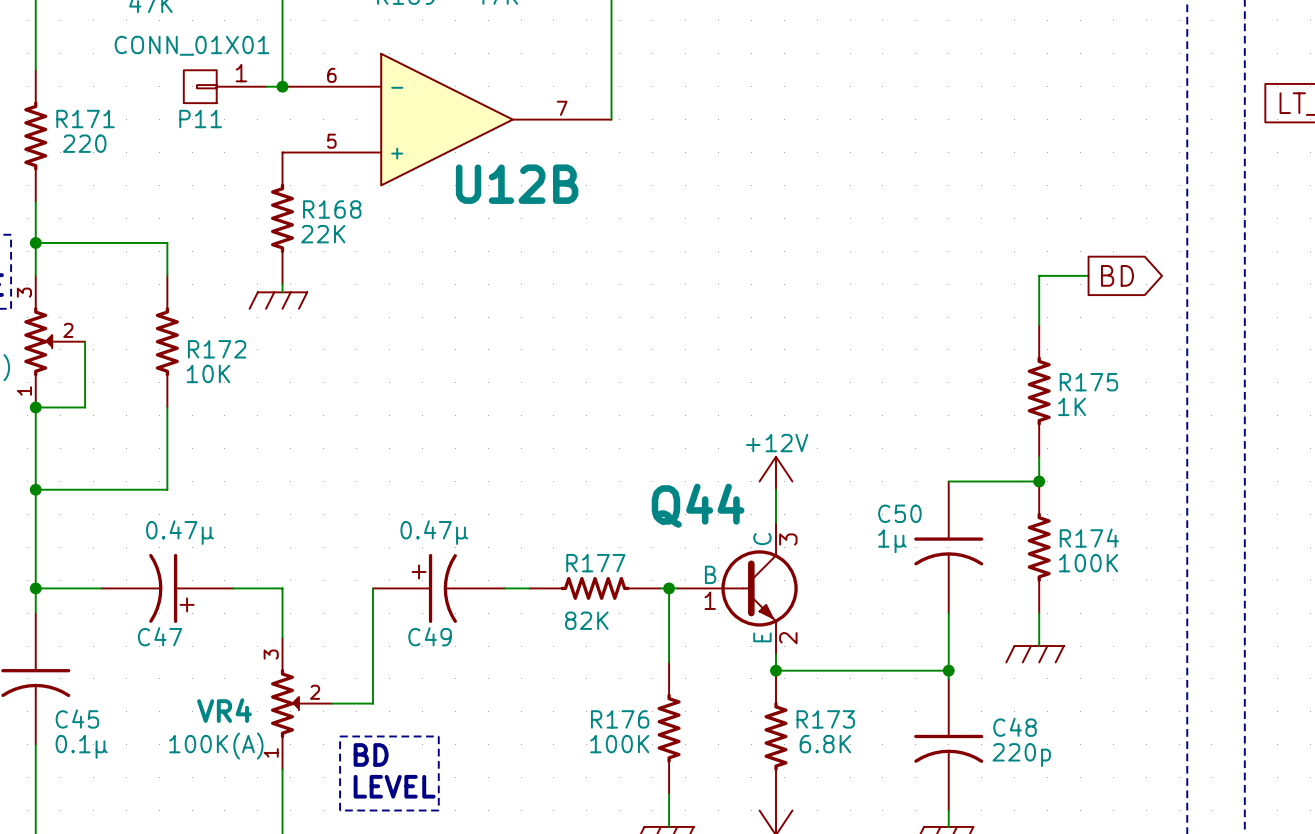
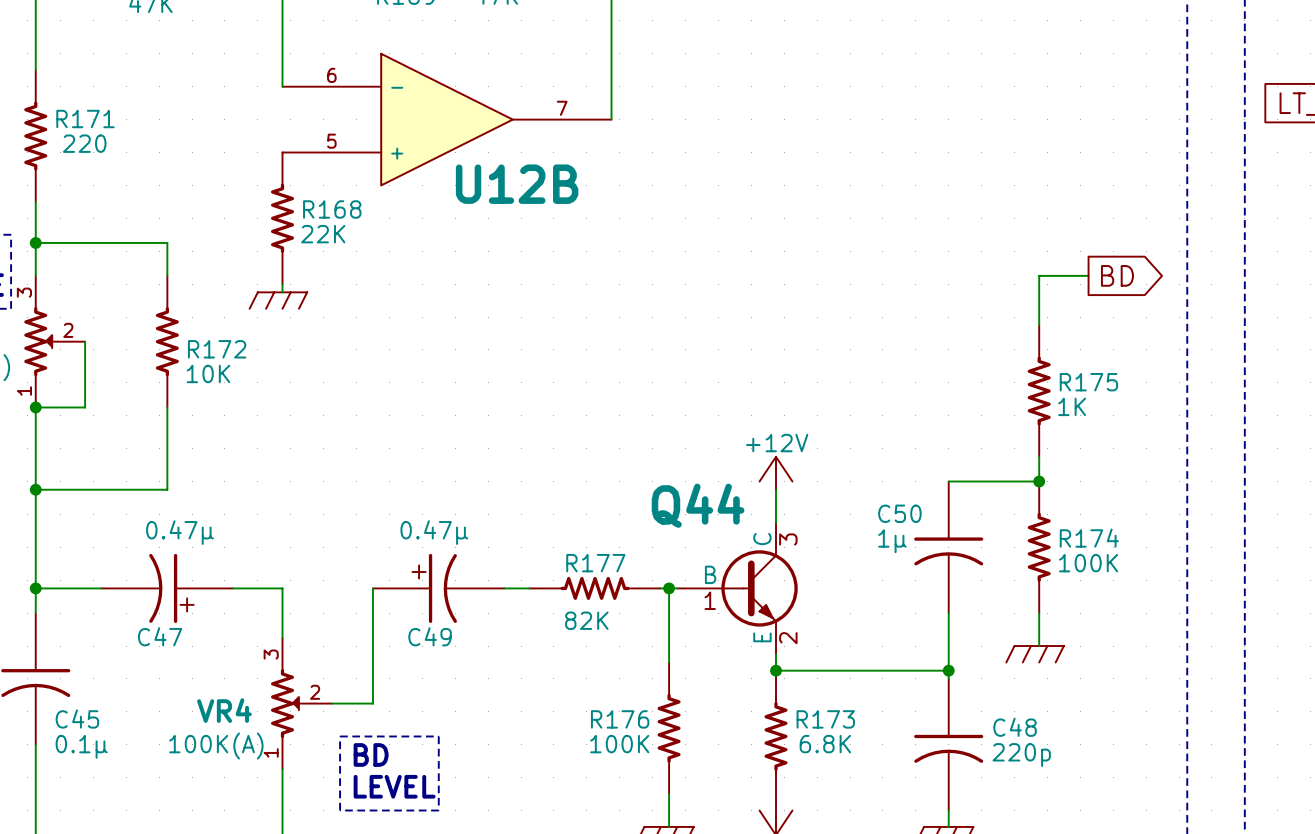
P11: CONN_01X01 (224, 86) -> none
wire: (266, 86) (282, 86) -> none
junction: (282, 86) -> none

